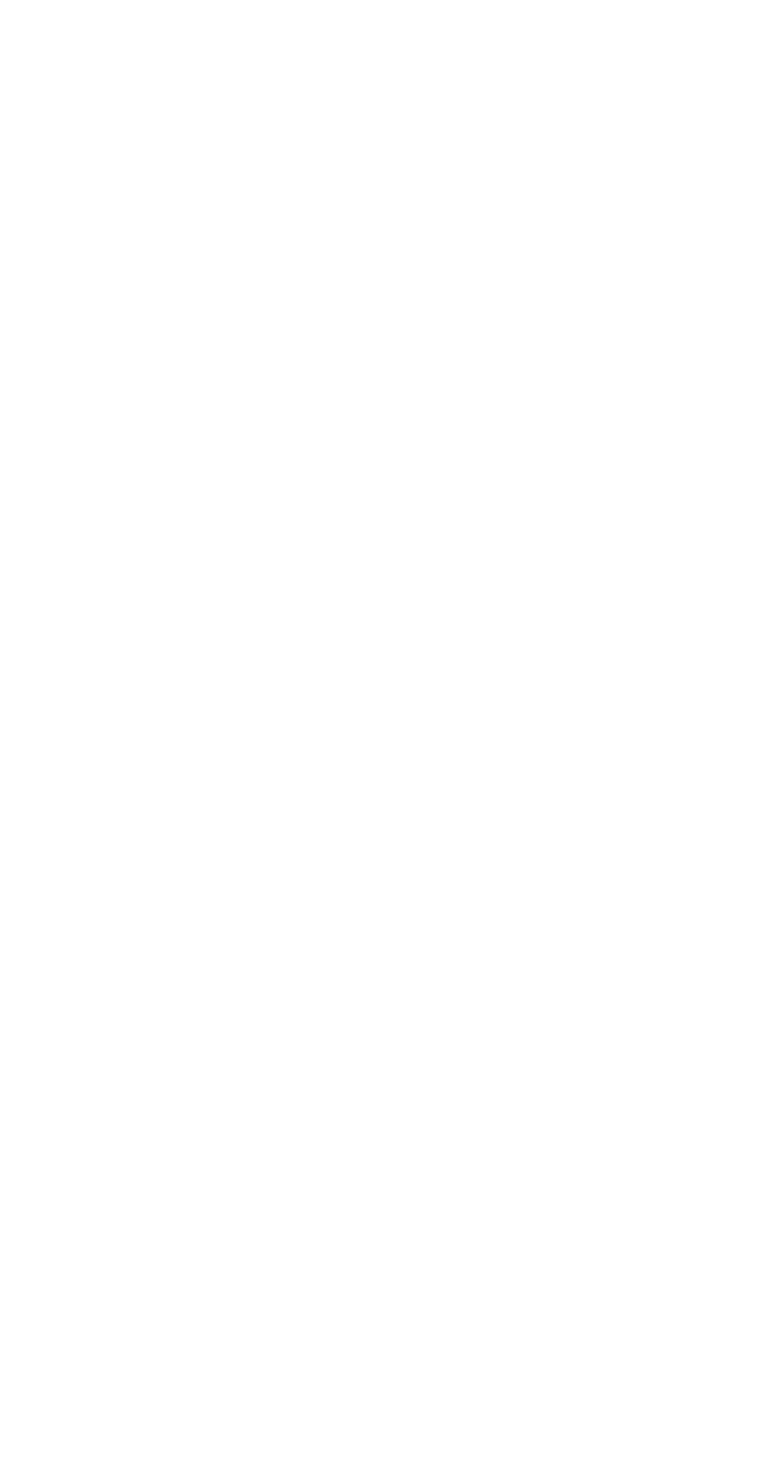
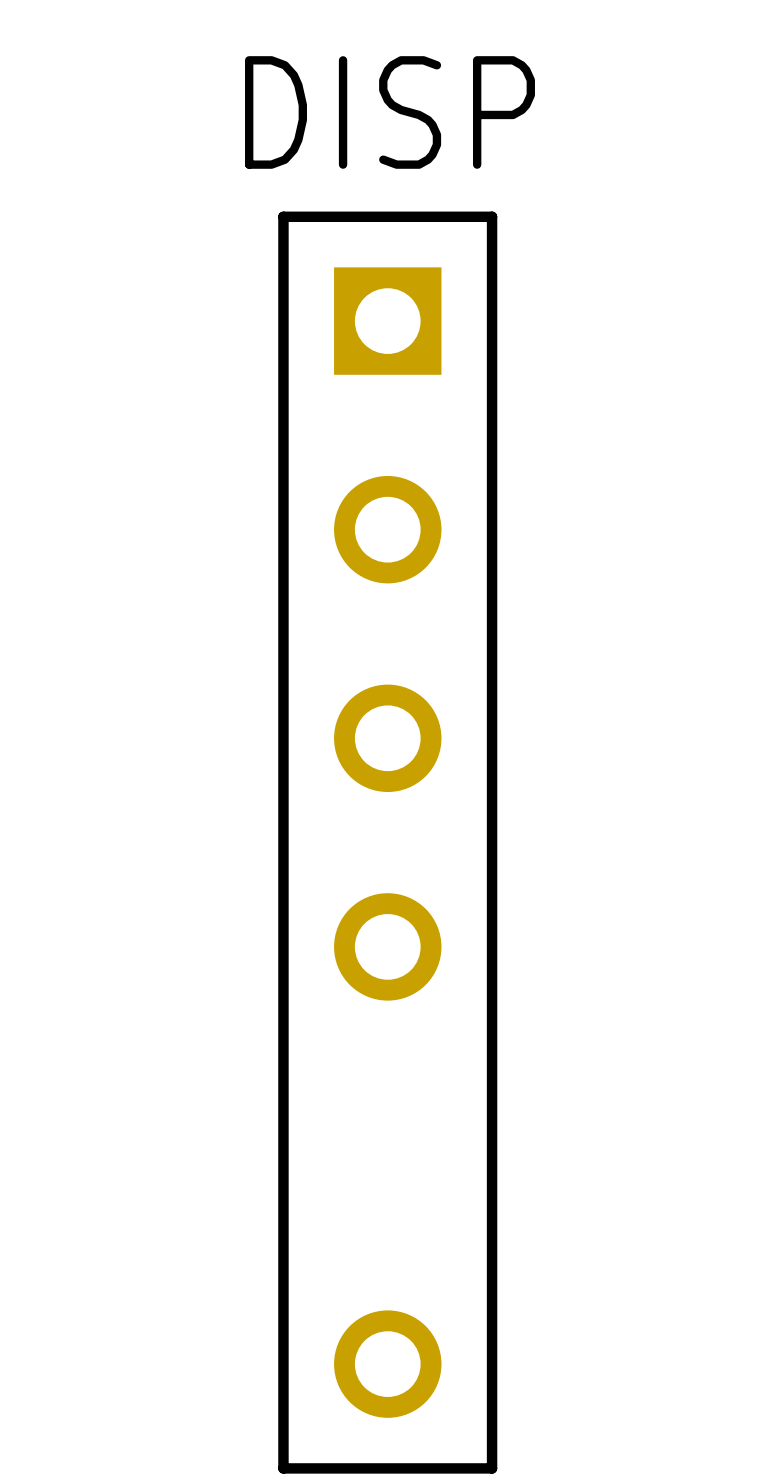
DISP: none -> (387, 842)

